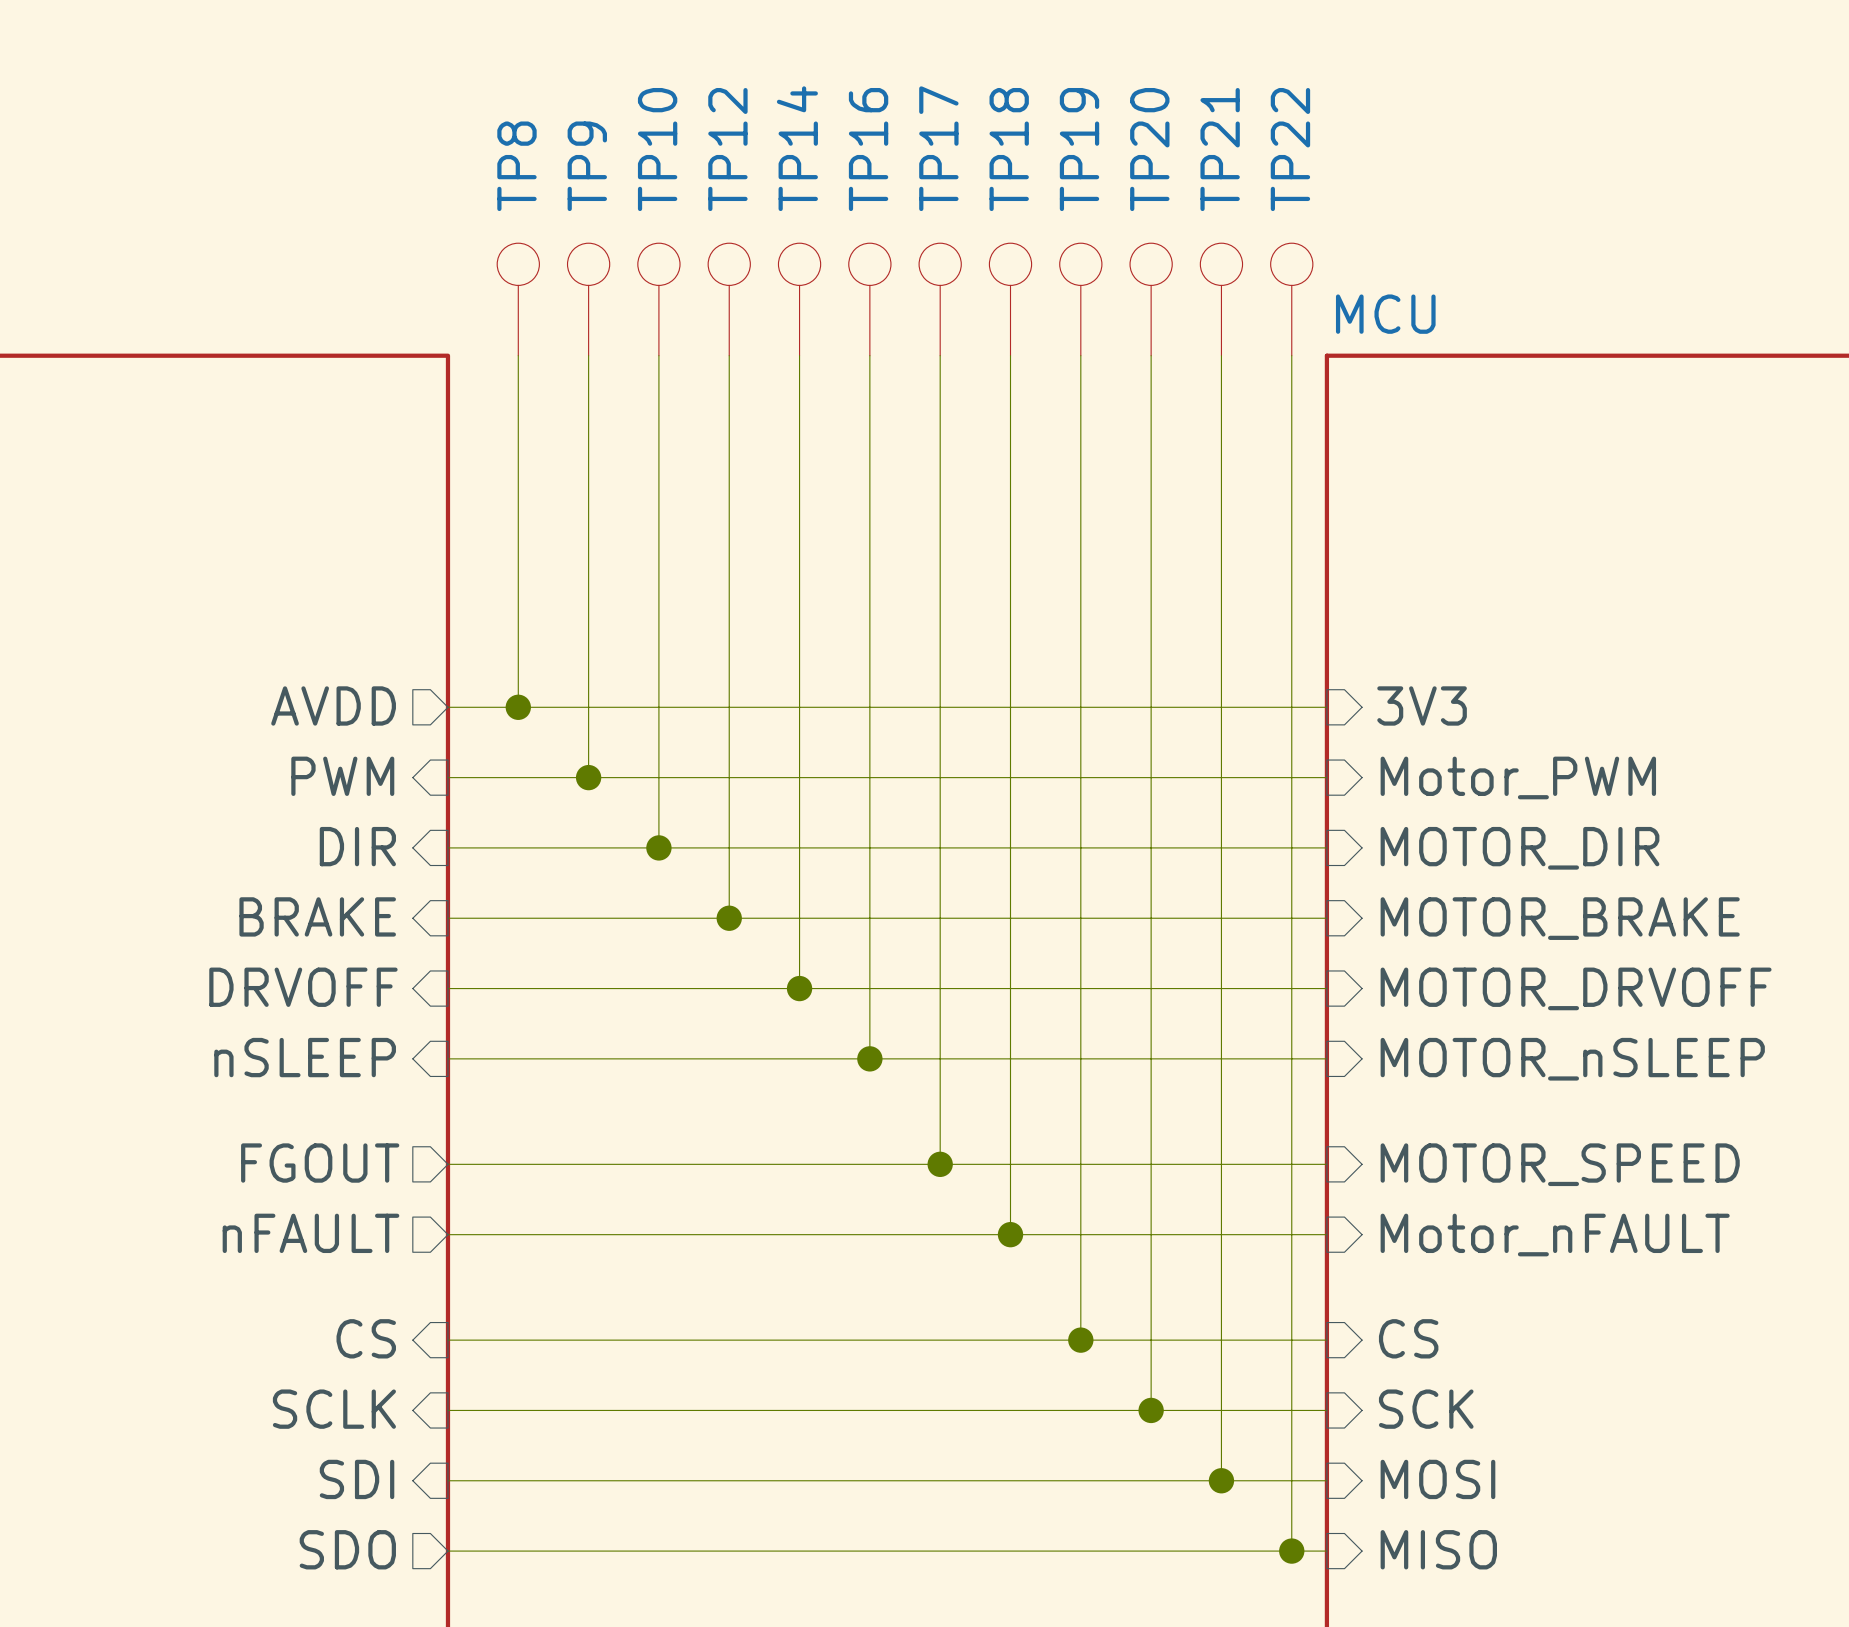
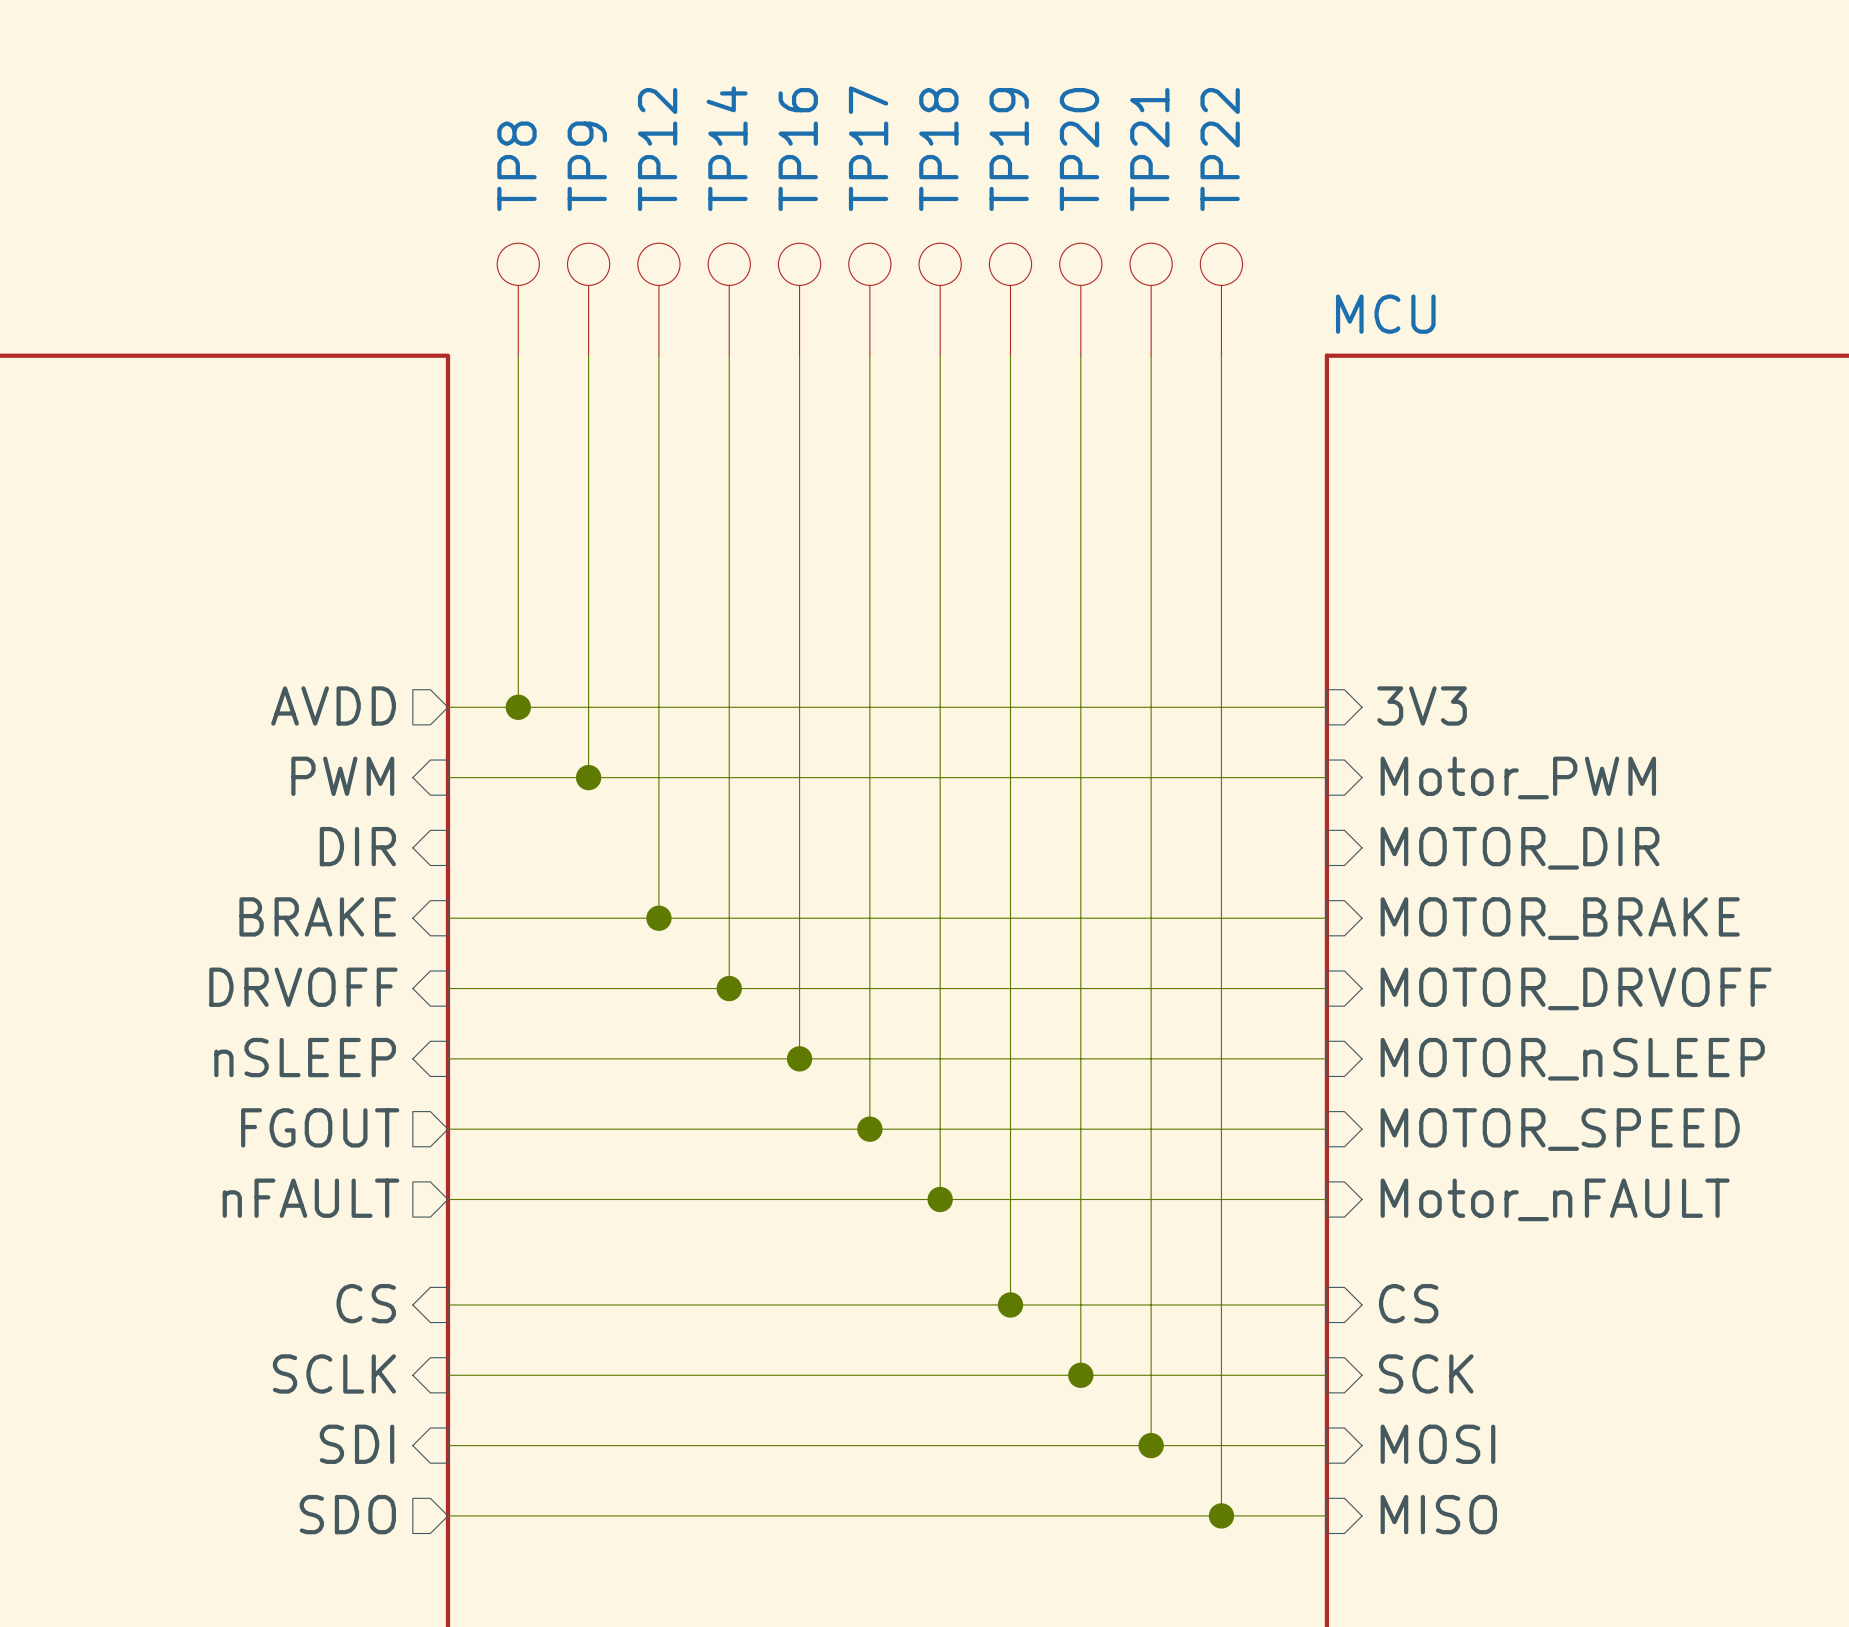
TP14 name: TP14 (797, 148) -> TP16 (798, 149)
TP17 name: TP17 (938, 148) -> TP18 (938, 149)
TP10 name: TP10 (657, 149) -> TP12 (657, 149)
TP12 name: TP12 (727, 149) -> TP14 (727, 148)
TP16 name: TP16 (868, 149) -> TP17 (868, 148)
TP18 name: TP18 (1009, 149) -> TP19 (1009, 149)
TP19 name: TP19 (1079, 149) -> TP20 (1079, 149)
TP20 name: TP20 (1149, 149) -> TP21 (1149, 149)
TP21 name: TP21 (1220, 149) -> TP22 (1220, 149)
TP22: (1291, 299) -> none
wire: (1291, 355) (1291, 1551) -> none
wire: (447, 847) (1326, 847) -> none
wire: none -> (658, 847) (658, 918)
junction: (658, 847) -> none
junction: none -> (658, 918)
wire: none -> (729, 918) (729, 988)
junction: (729, 918) -> none
junction: none -> (729, 988)
wire: none -> (799, 988) (799, 1058)
junction: (799, 988) -> none
junction: none -> (799, 1058)
wire: none -> (869, 1058) (869, 1129)
junction: (869, 1058) -> none
junction: none -> (869, 1129)
sheet pin position: FGOUT (320, 1163) -> FGOUT (320, 1127)
wire: (447, 1164) (1326, 1164) -> (447, 1129) (1326, 1129)
wire: none -> (940, 1164) (940, 1199)
junction position: (940, 1164) -> (940, 1199)
sheet pin position: MOTOR_SPEED (1560, 1164) -> MOTOR_SPEED (1560, 1129)
sheet pin position: nFAULT (310, 1233) -> nFAULT (310, 1198)
wire: (447, 1234) (1326, 1234) -> (447, 1199) (1326, 1199)
wire: none -> (1010, 1234) (1010, 1304)
junction: (1010, 1234) -> none
sheet pin position: Motor_nFAULT (1555, 1235) -> Motor_nFAULT (1555, 1199)
junction: none -> (1010, 1304)
sheet pin position: CS (366, 1338) -> CS (366, 1303)
sheet pin position: CS (1408, 1338) -> CS (1408, 1303)
wire: (447, 1340) (1326, 1340) -> (447, 1304) (1326, 1304)
wire: none -> (1080, 1340) (1080, 1375)
junction position: (1080, 1340) -> (1080, 1375)
sheet pin position: SCLK (334, 1409) -> SCLK (334, 1373)
sheet pin position: SCK (1426, 1409) -> SCK (1426, 1373)
wire: (447, 1410) (1326, 1410) -> (447, 1375) (1326, 1375)
wire: none -> (1151, 1410) (1151, 1445)
junction position: (1151, 1410) -> (1151, 1445)
sheet pin position: SDI (357, 1479) -> SDI (357, 1444)
sheet pin position: MOSI (1437, 1479) -> MOSI (1437, 1444)
wire: (447, 1480) (1326, 1480) -> (447, 1445) (1326, 1445)
wire: none -> (1221, 1480) (1221, 1515)
junction position: (1221, 1480) -> (1221, 1515)
sheet pin position: SDO (347, 1549) -> SDO (347, 1514)
sheet pin position: MISO (1438, 1549) -> MISO (1438, 1514)
wire: (447, 1551) (1326, 1551) -> (447, 1515) (1326, 1515)
junction: (1291, 1551) -> none

